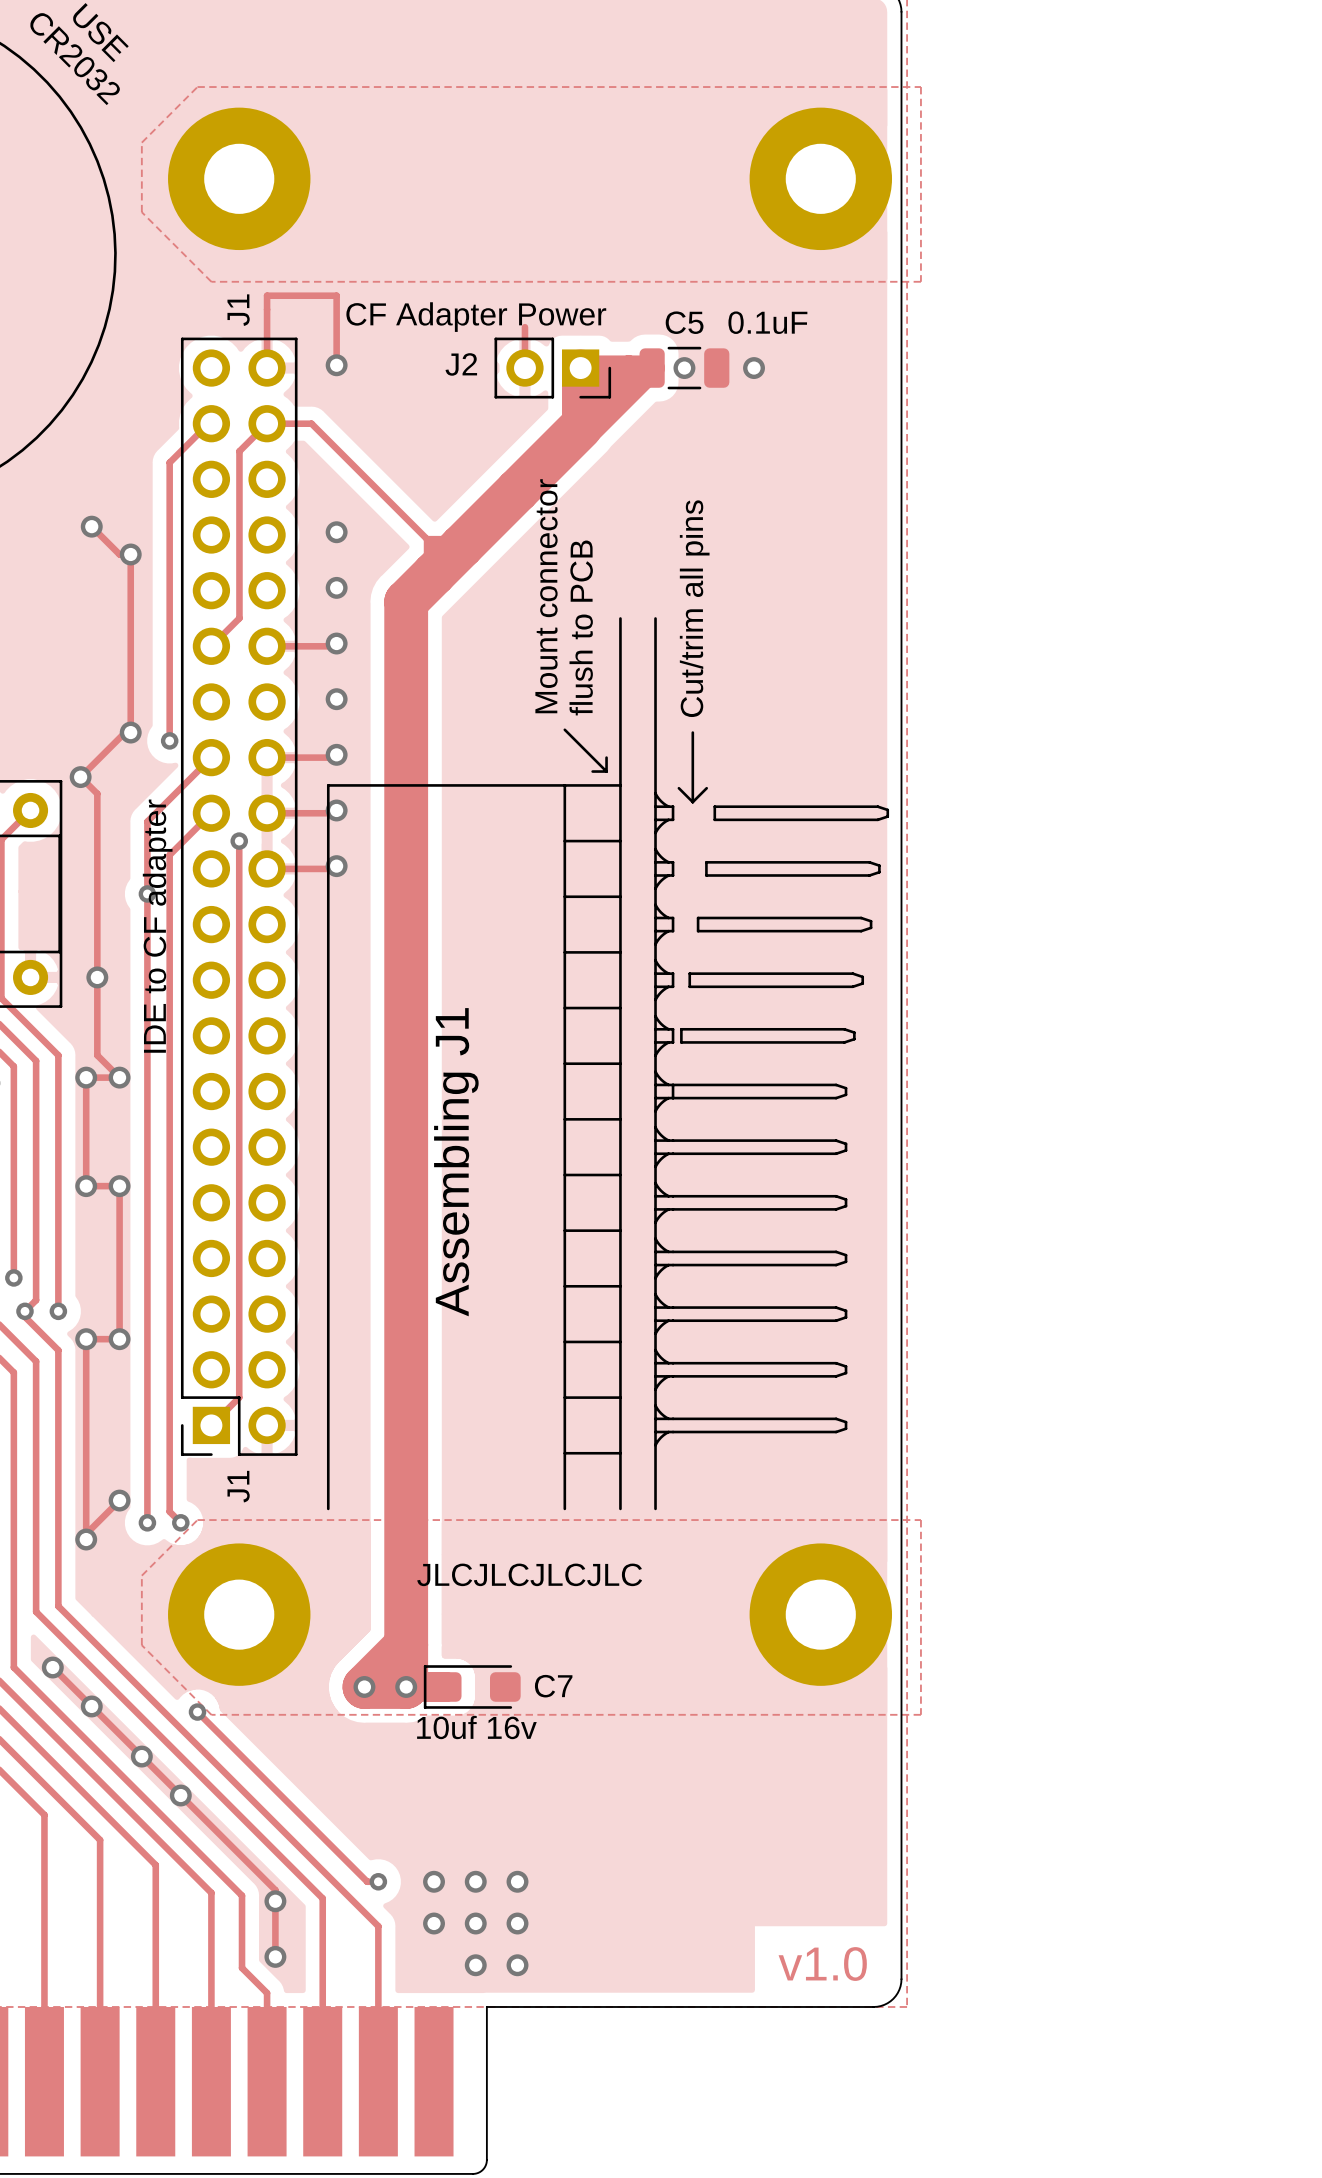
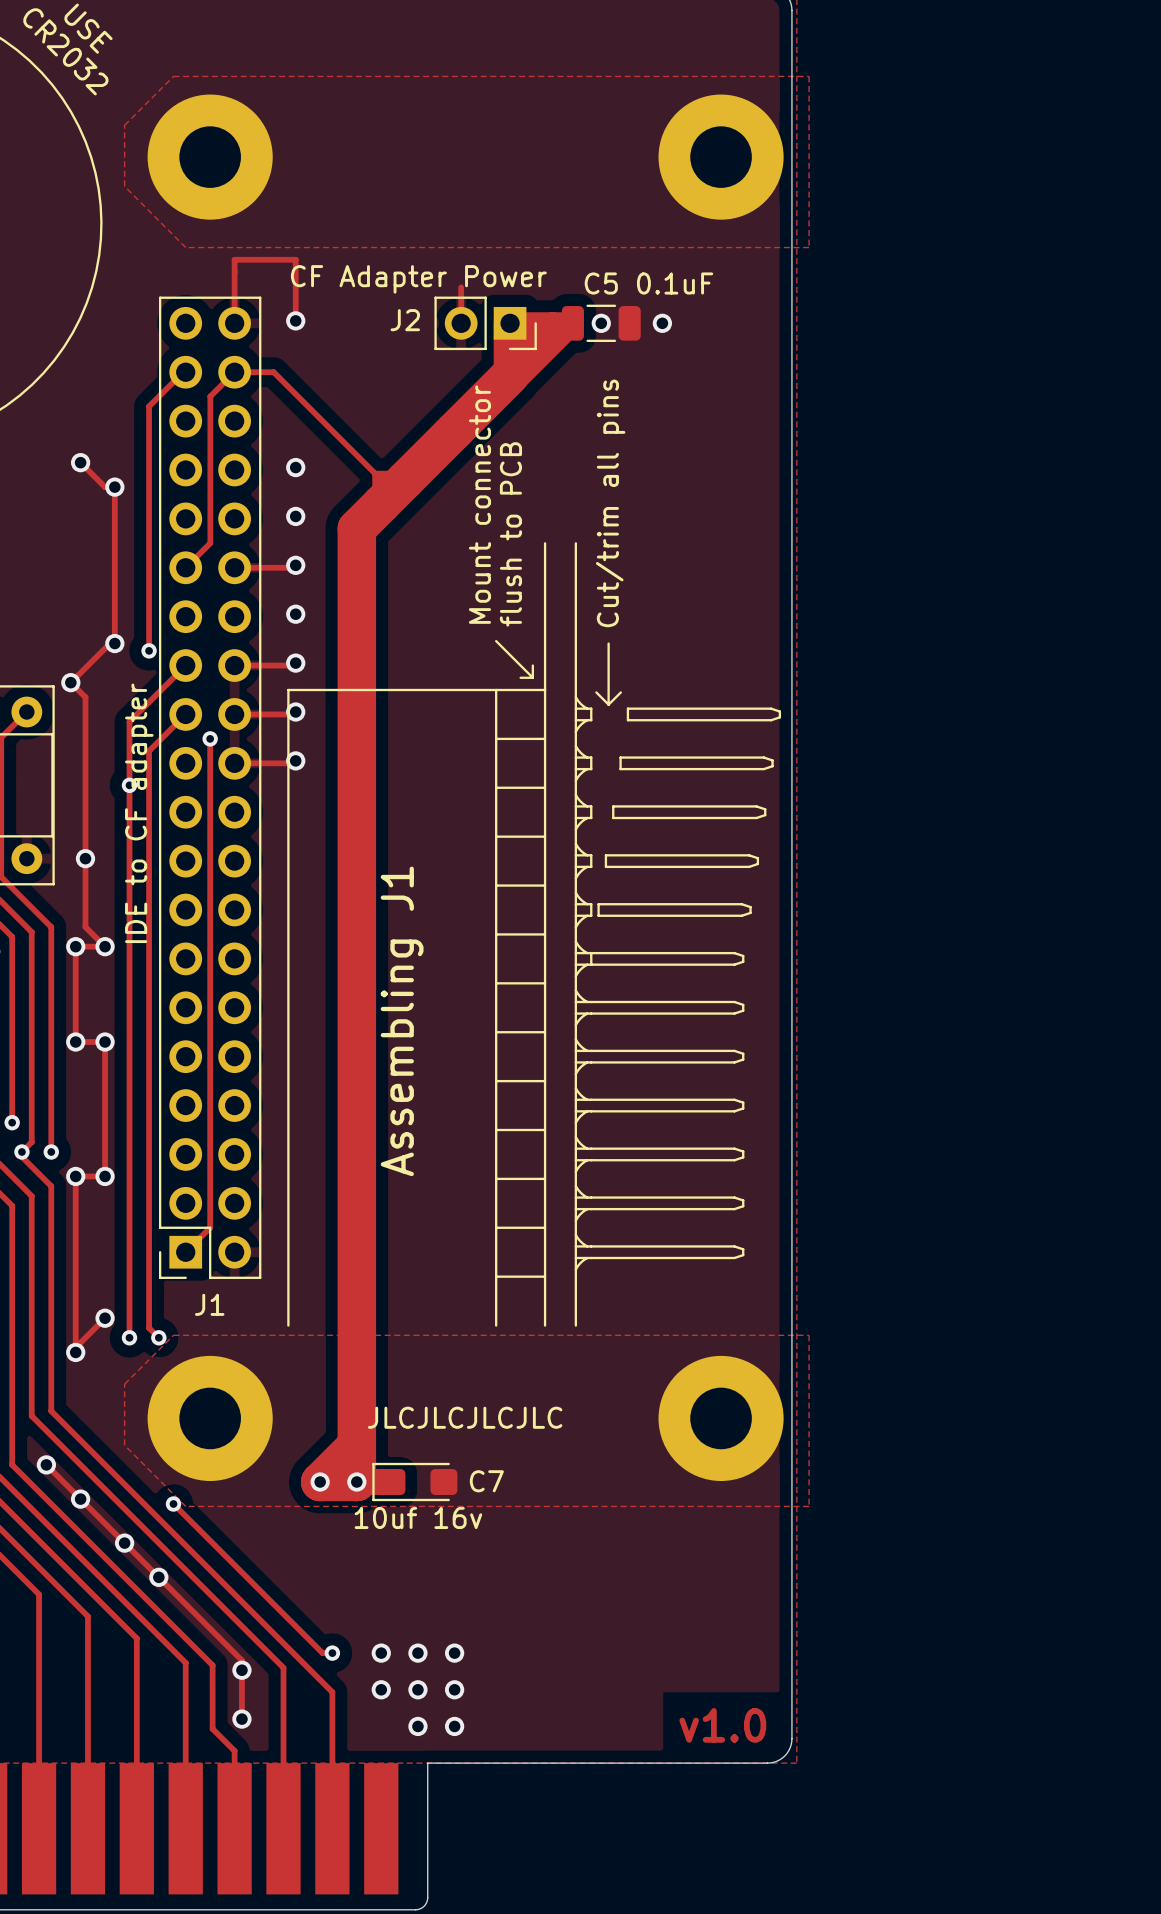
text: J1 (238, 310) -> none
J1 name rotation: 0° (238, 1486) -> 90° clockwise (209, 1304)
text position: JLCJLCJLCJLC (529, 1574) -> JLCJLCJLCJLC (465, 1417)

